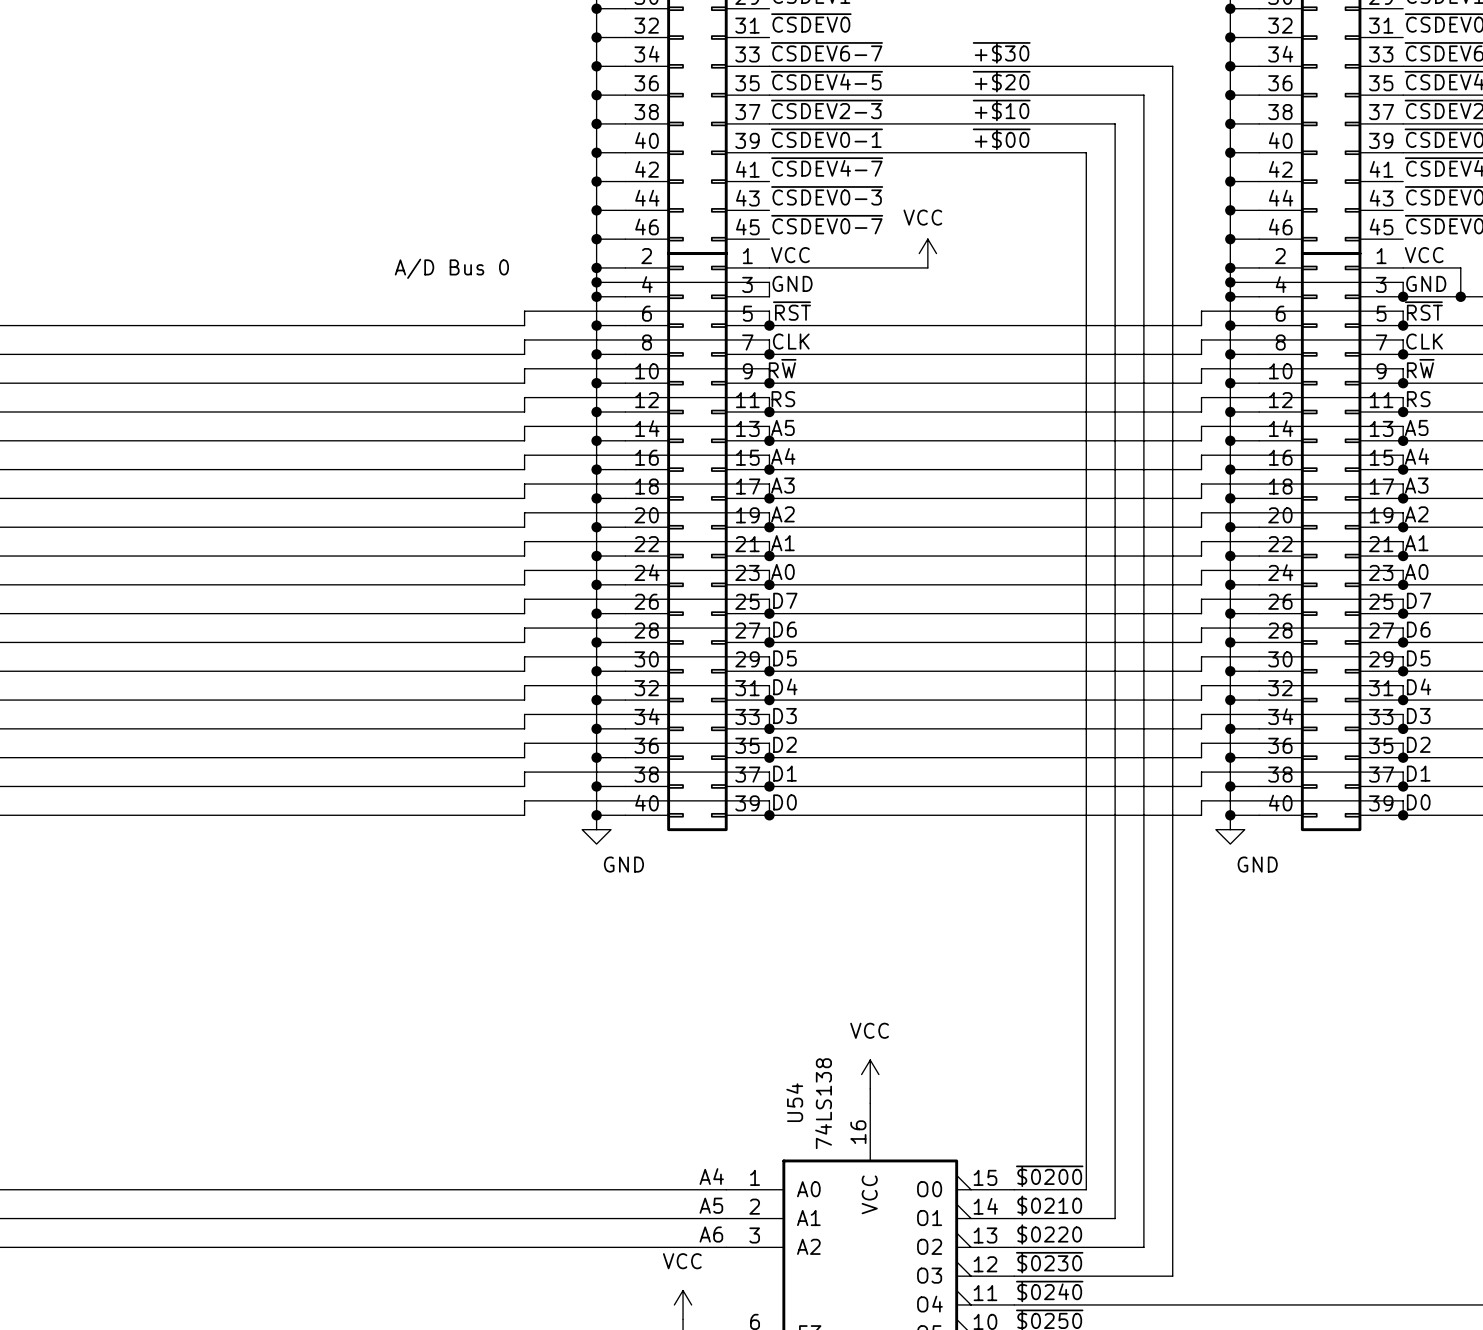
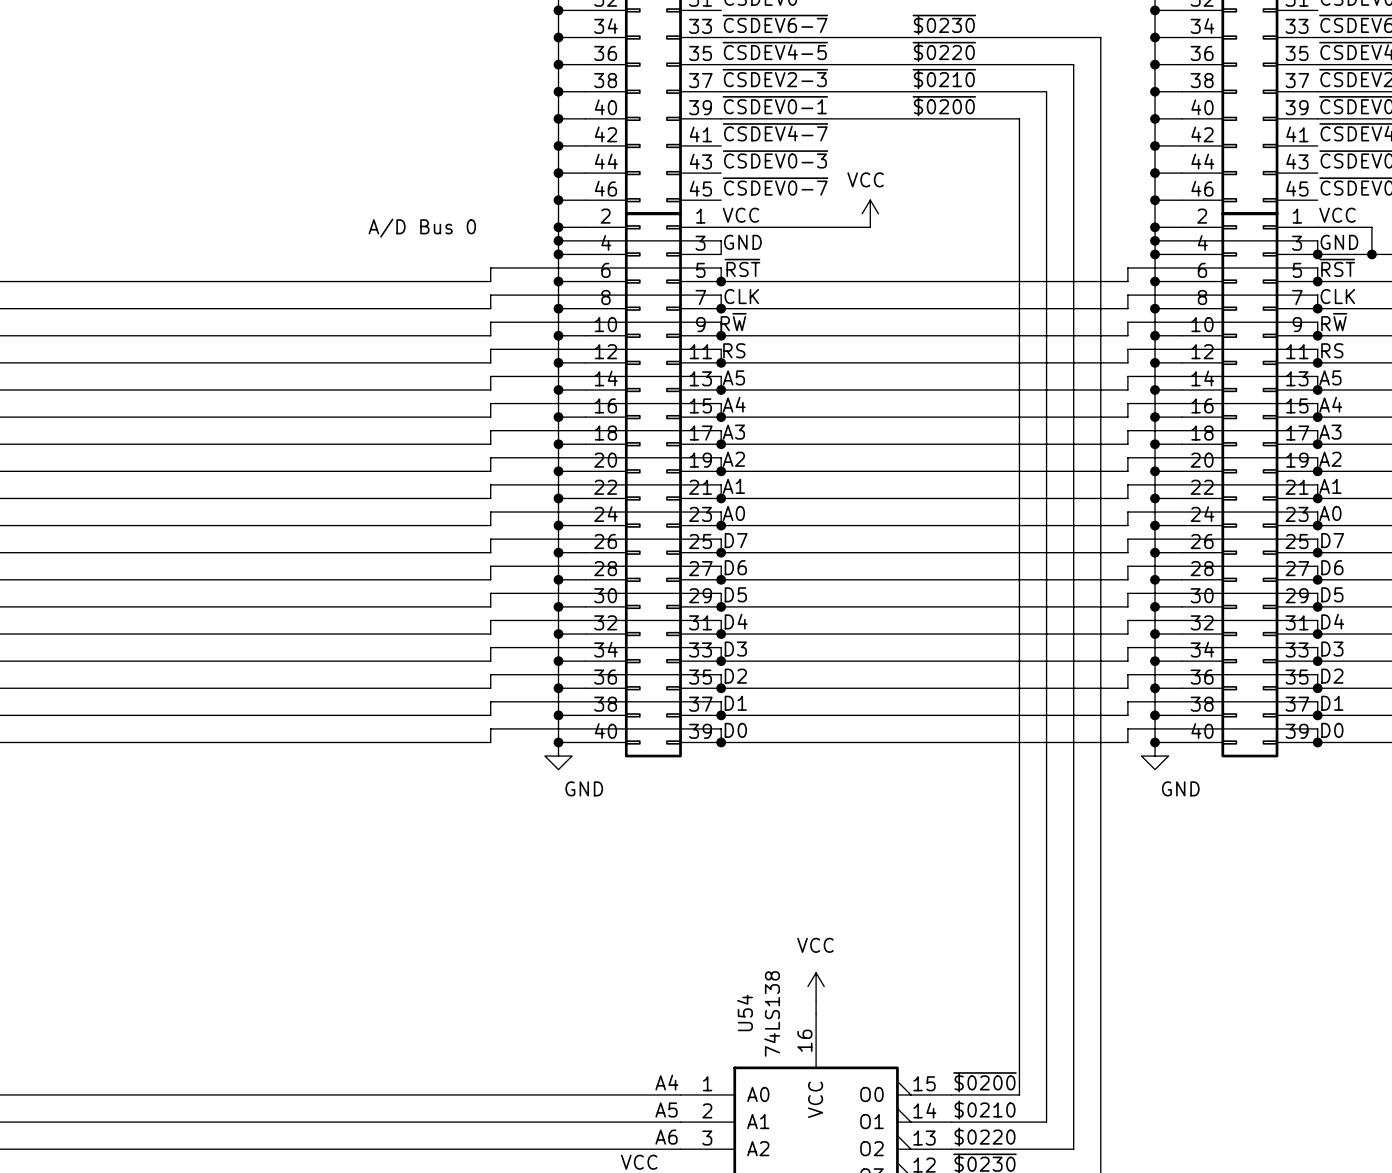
label: ~{+$30} (1001, 52) -> ~{$0230} (944, 24)
label: ~{+$20} (1001, 81) -> ~{$0220} (944, 51)
label: ~{+$10} (1001, 110) -> ~{$0210} (944, 79)
label: ~{+$00} (1001, 139) -> ~{$0200} (944, 106)

